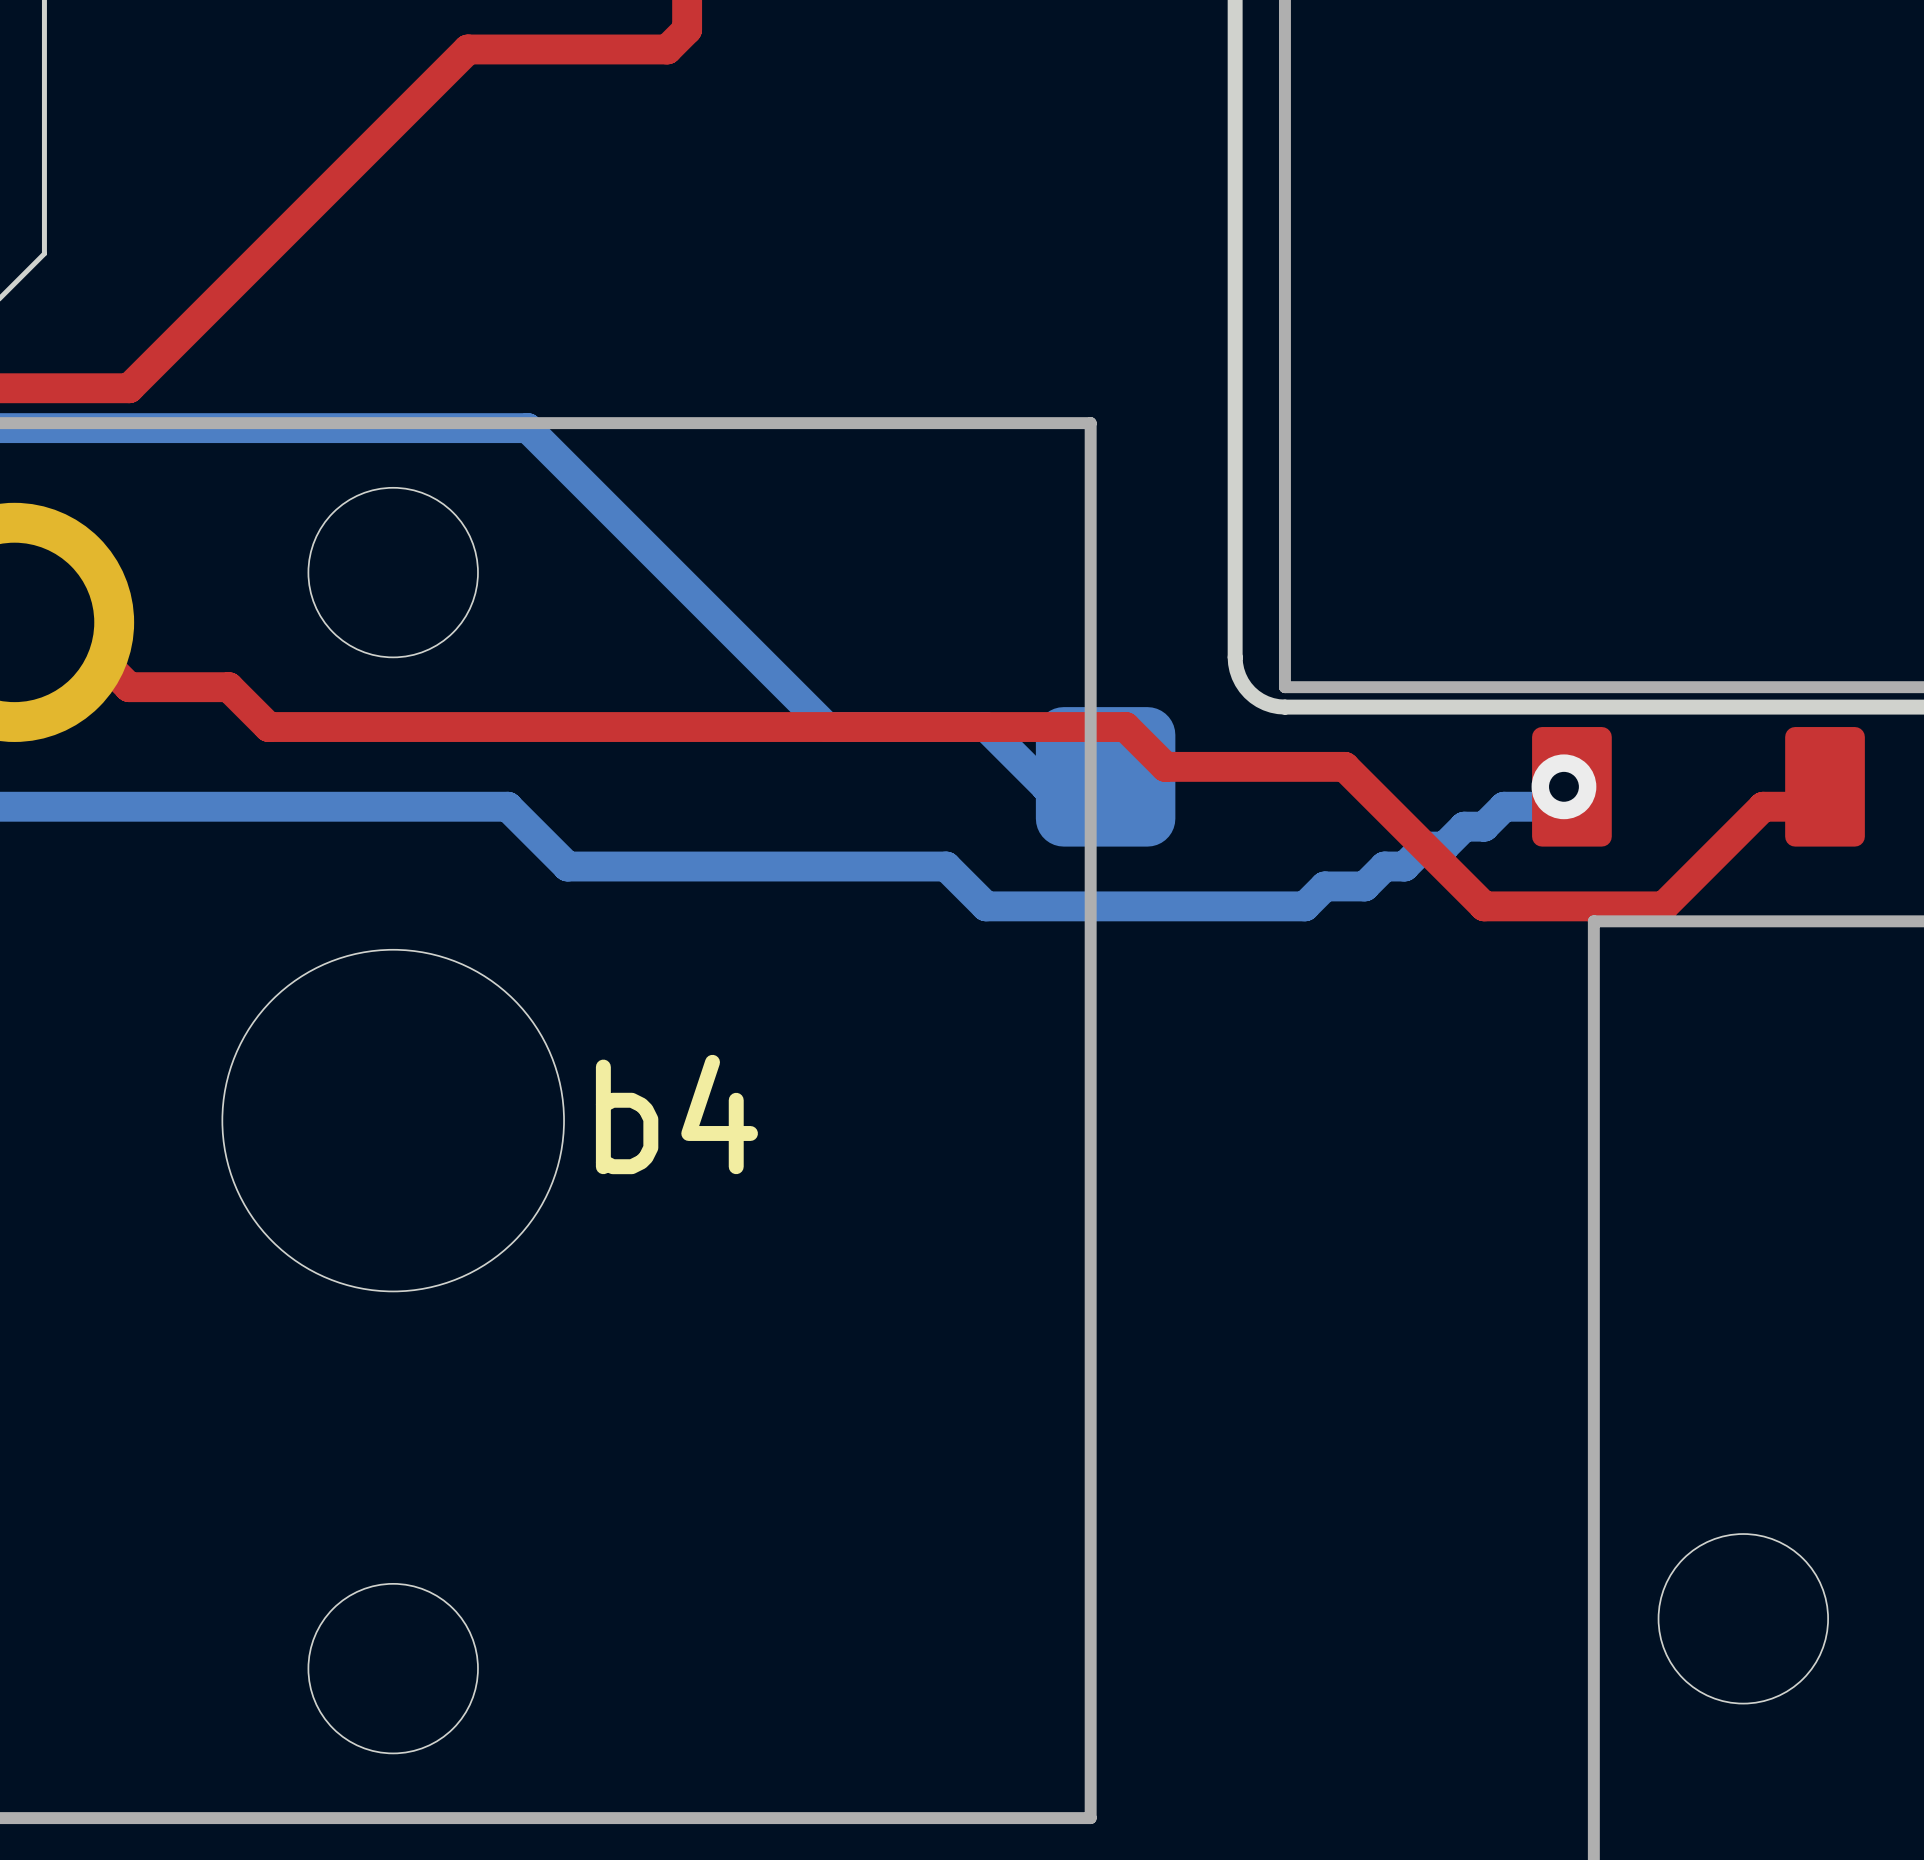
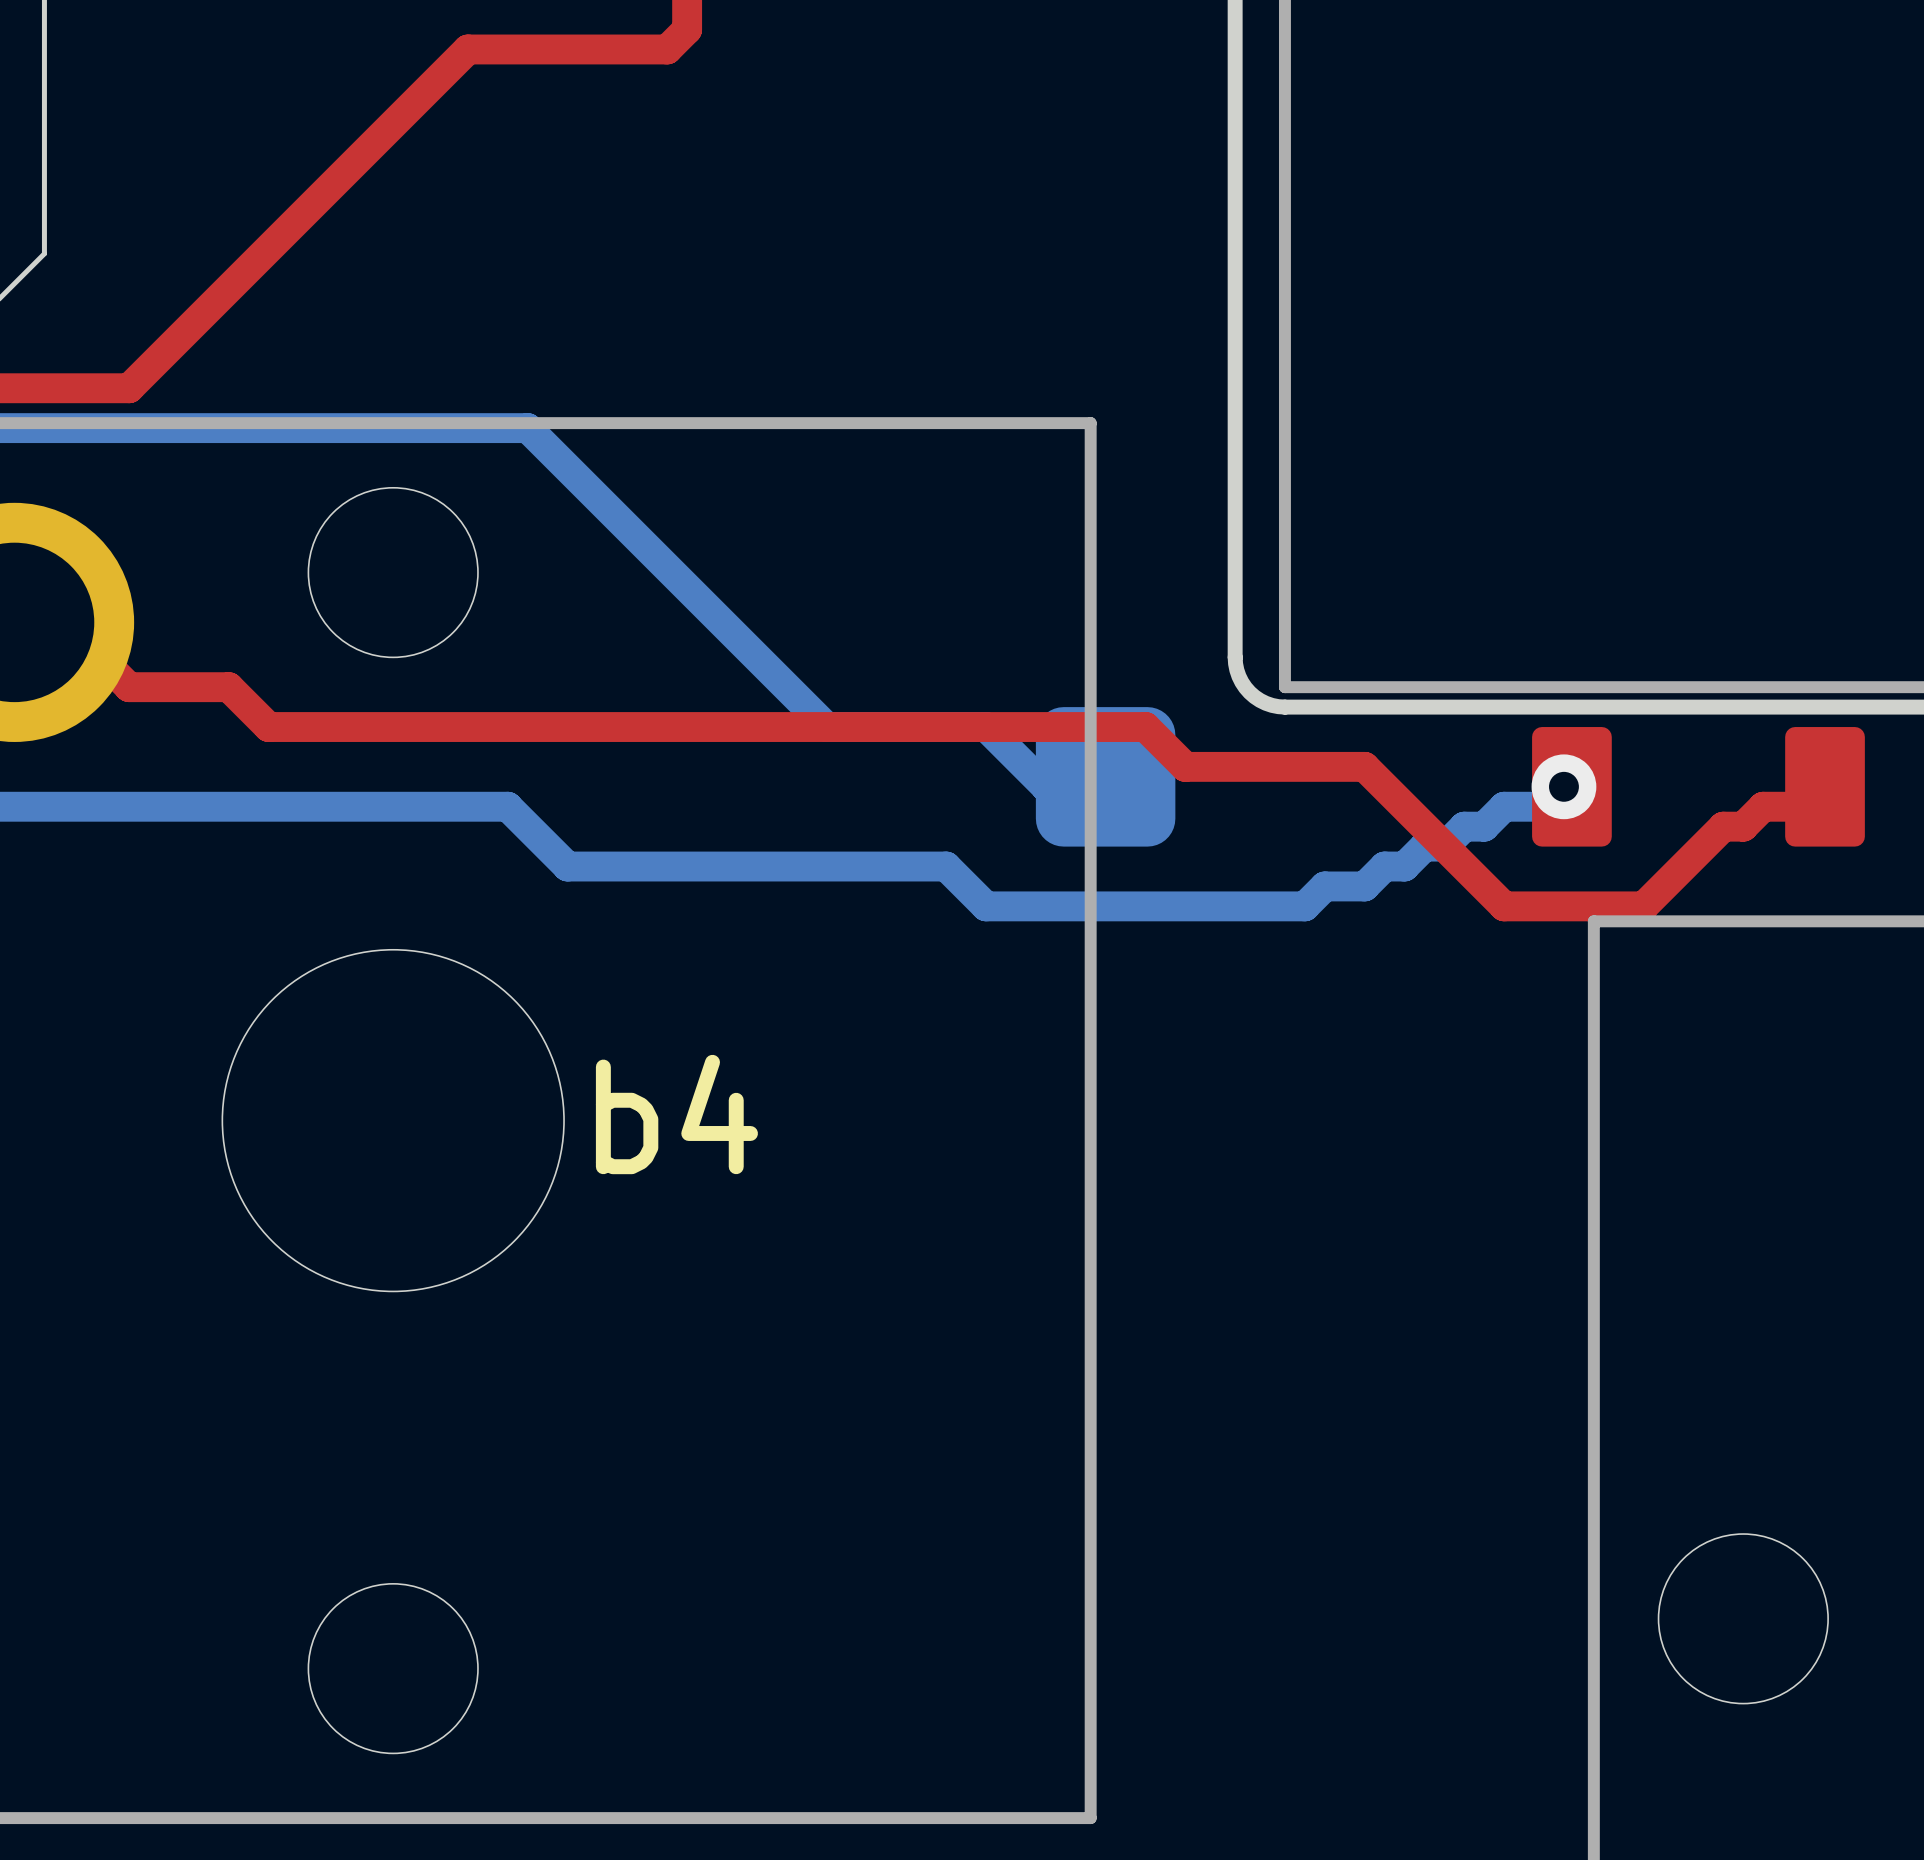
top track: (1125, 727) (1165, 766) (1185, 766) -> (1125, 727) (1145, 727) (1185, 766)
top track: (1344, 766) (1484, 906) (1504, 906) -> (1344, 766) (1364, 766) (1504, 906)
top track: (1743, 826) (1663, 906) (1643, 906) -> (1743, 826) (1723, 826) (1643, 906)

